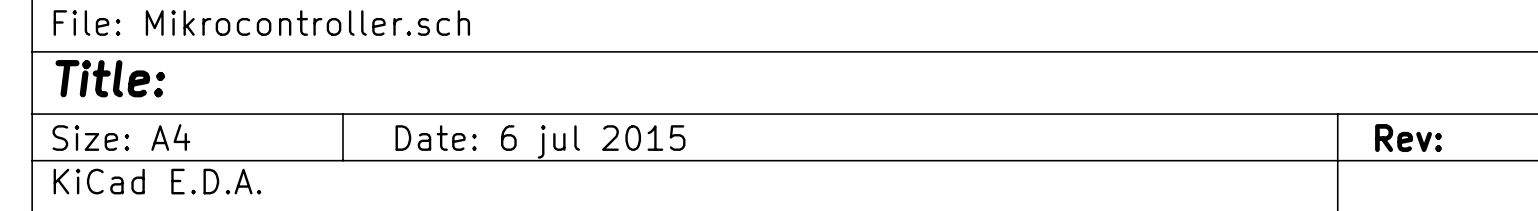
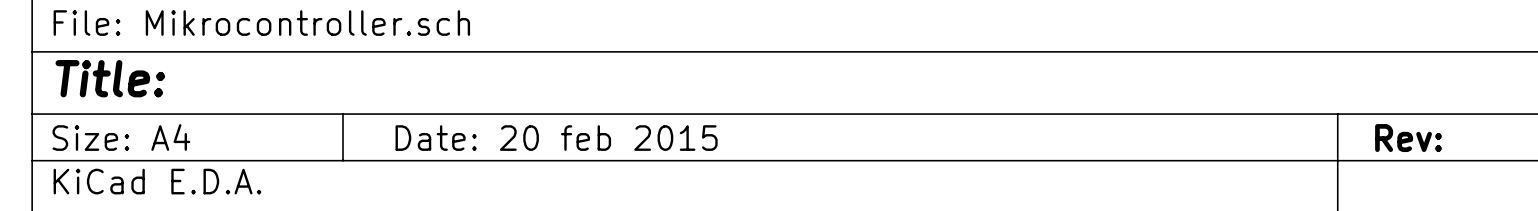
title block: Date: 6 jul 2015 (540, 141) -> Date: 20 feb 2015 (556, 138)

